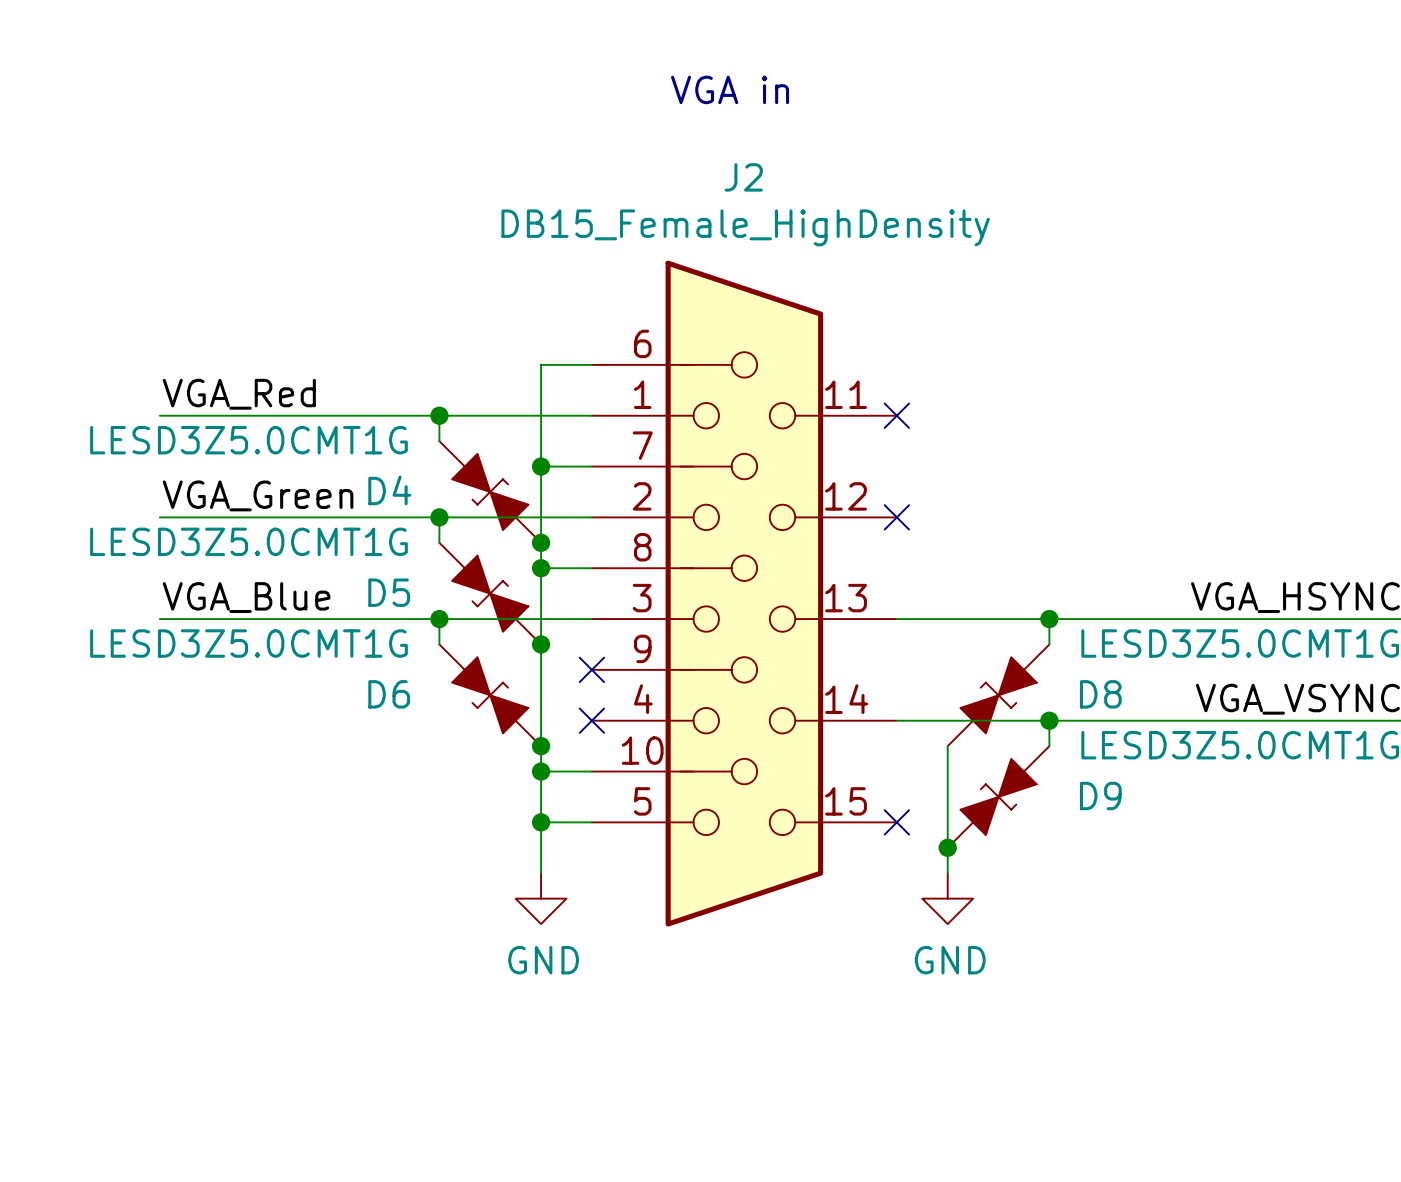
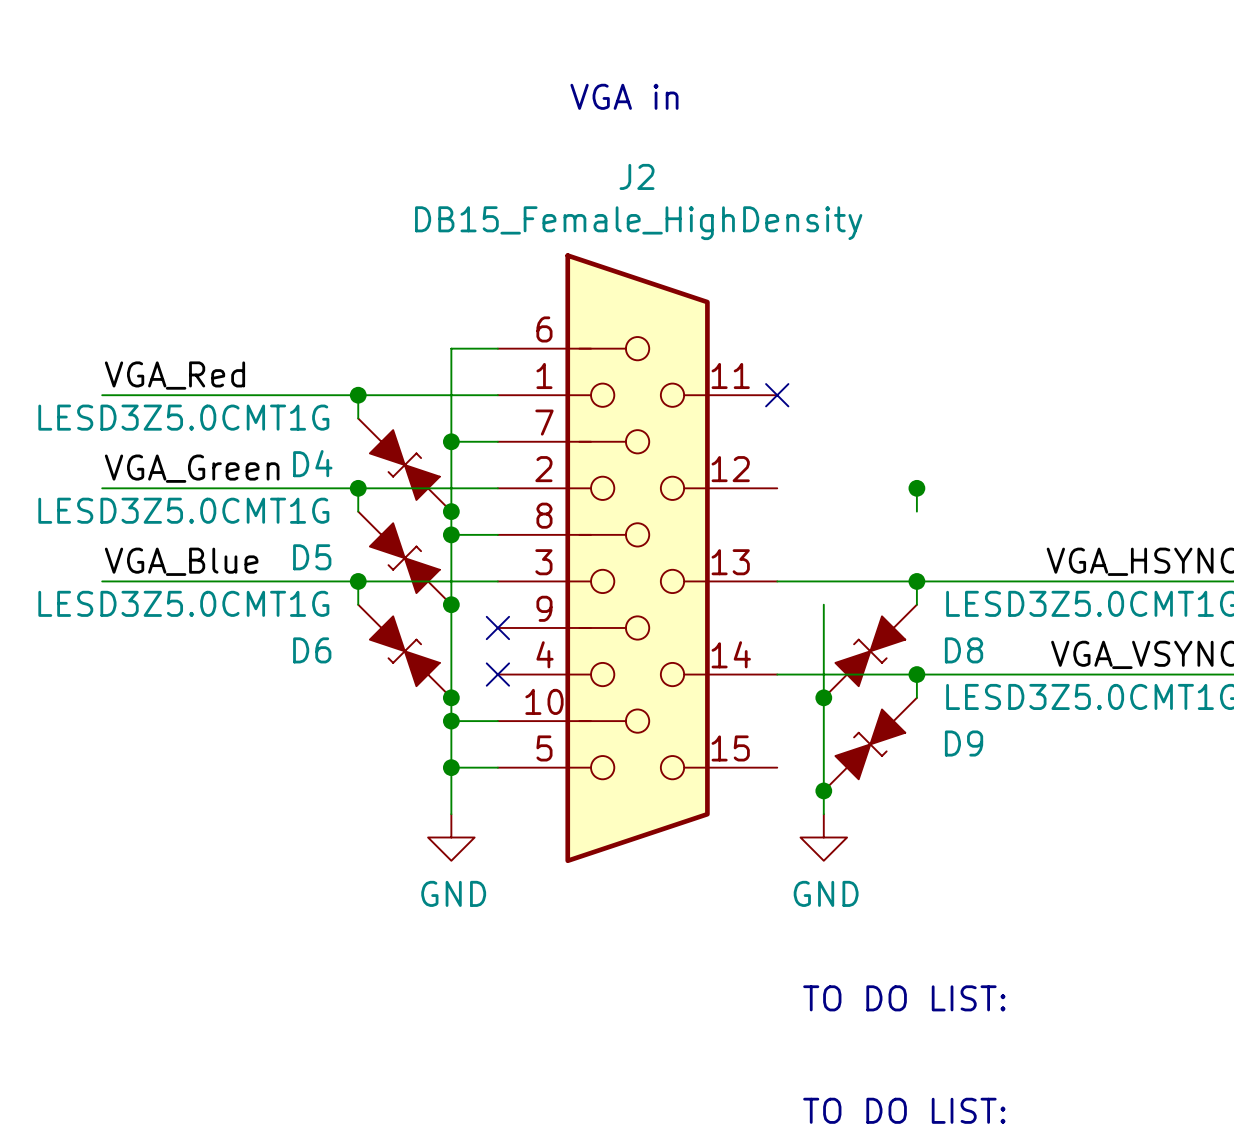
no-connect mark: (896, 517) -> none
wire: none -> (916, 488) (916, 511)
junction: none -> (916, 488)
wire: none -> (823, 604) (823, 697)
junction: none -> (823, 697)
no-connect mark: (896, 822) -> none
text: none -> TO DO LIST: (904, 998)

